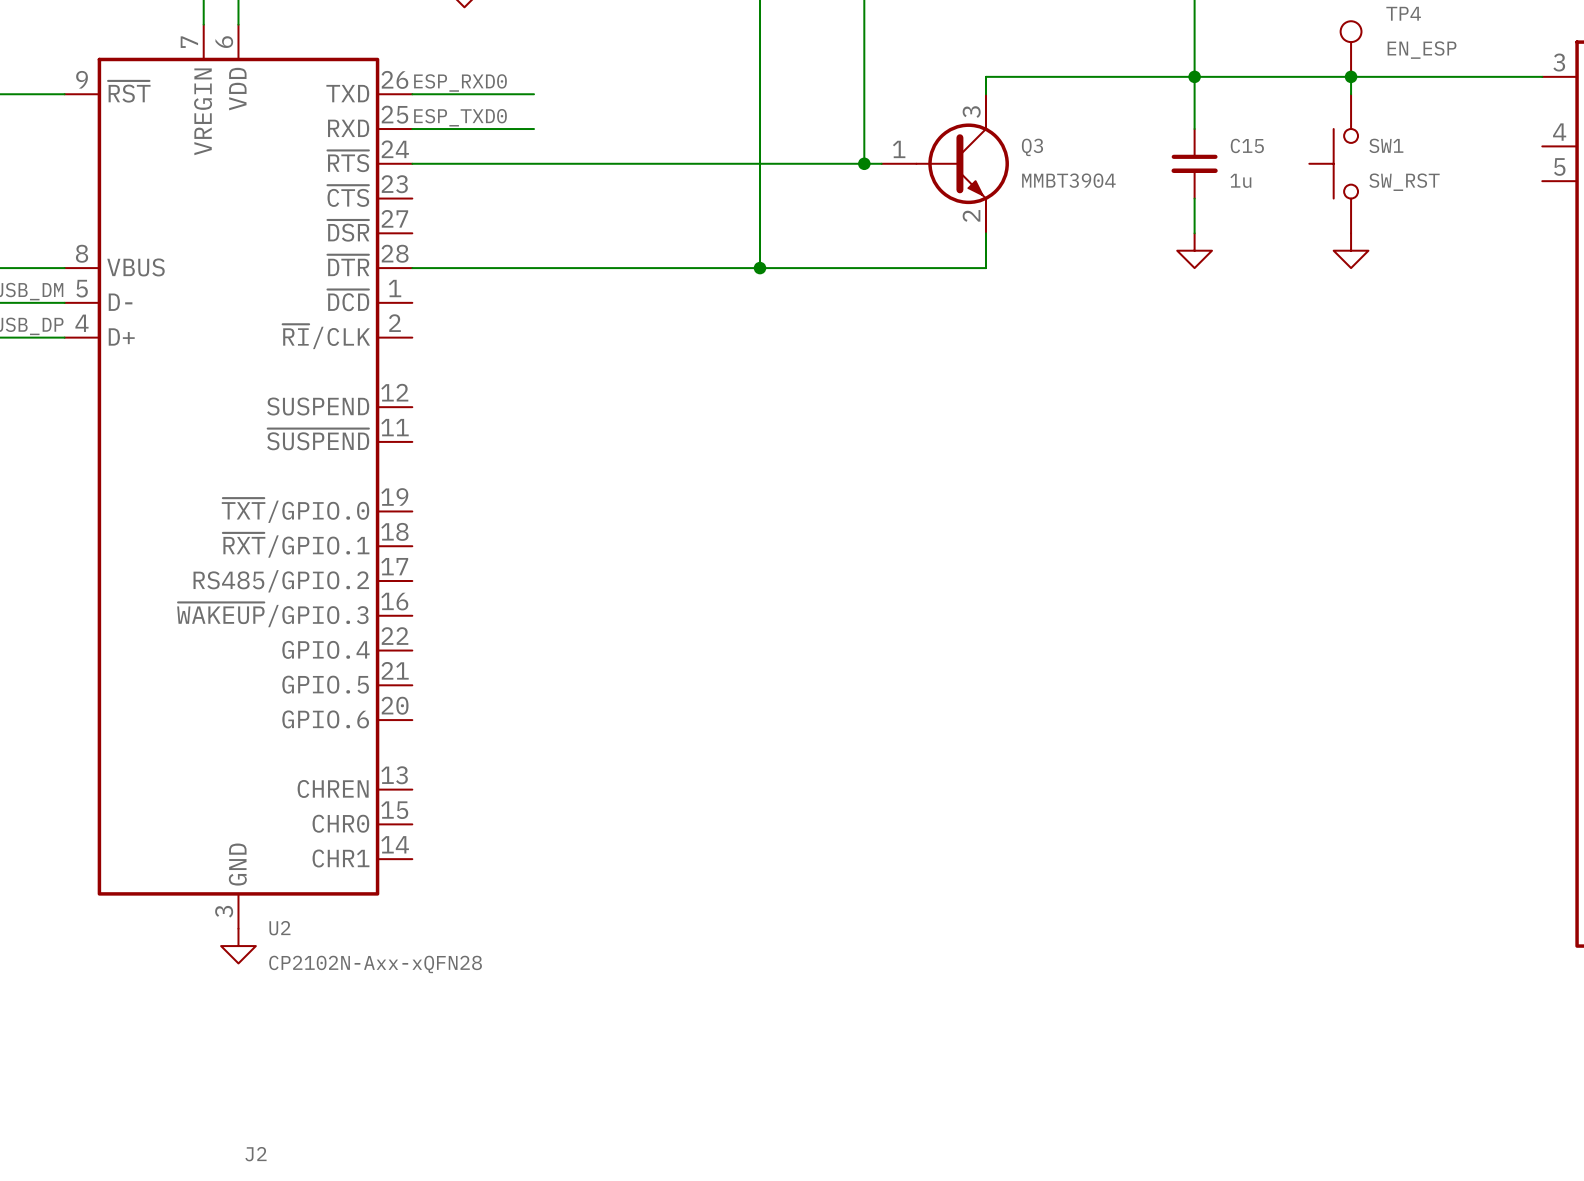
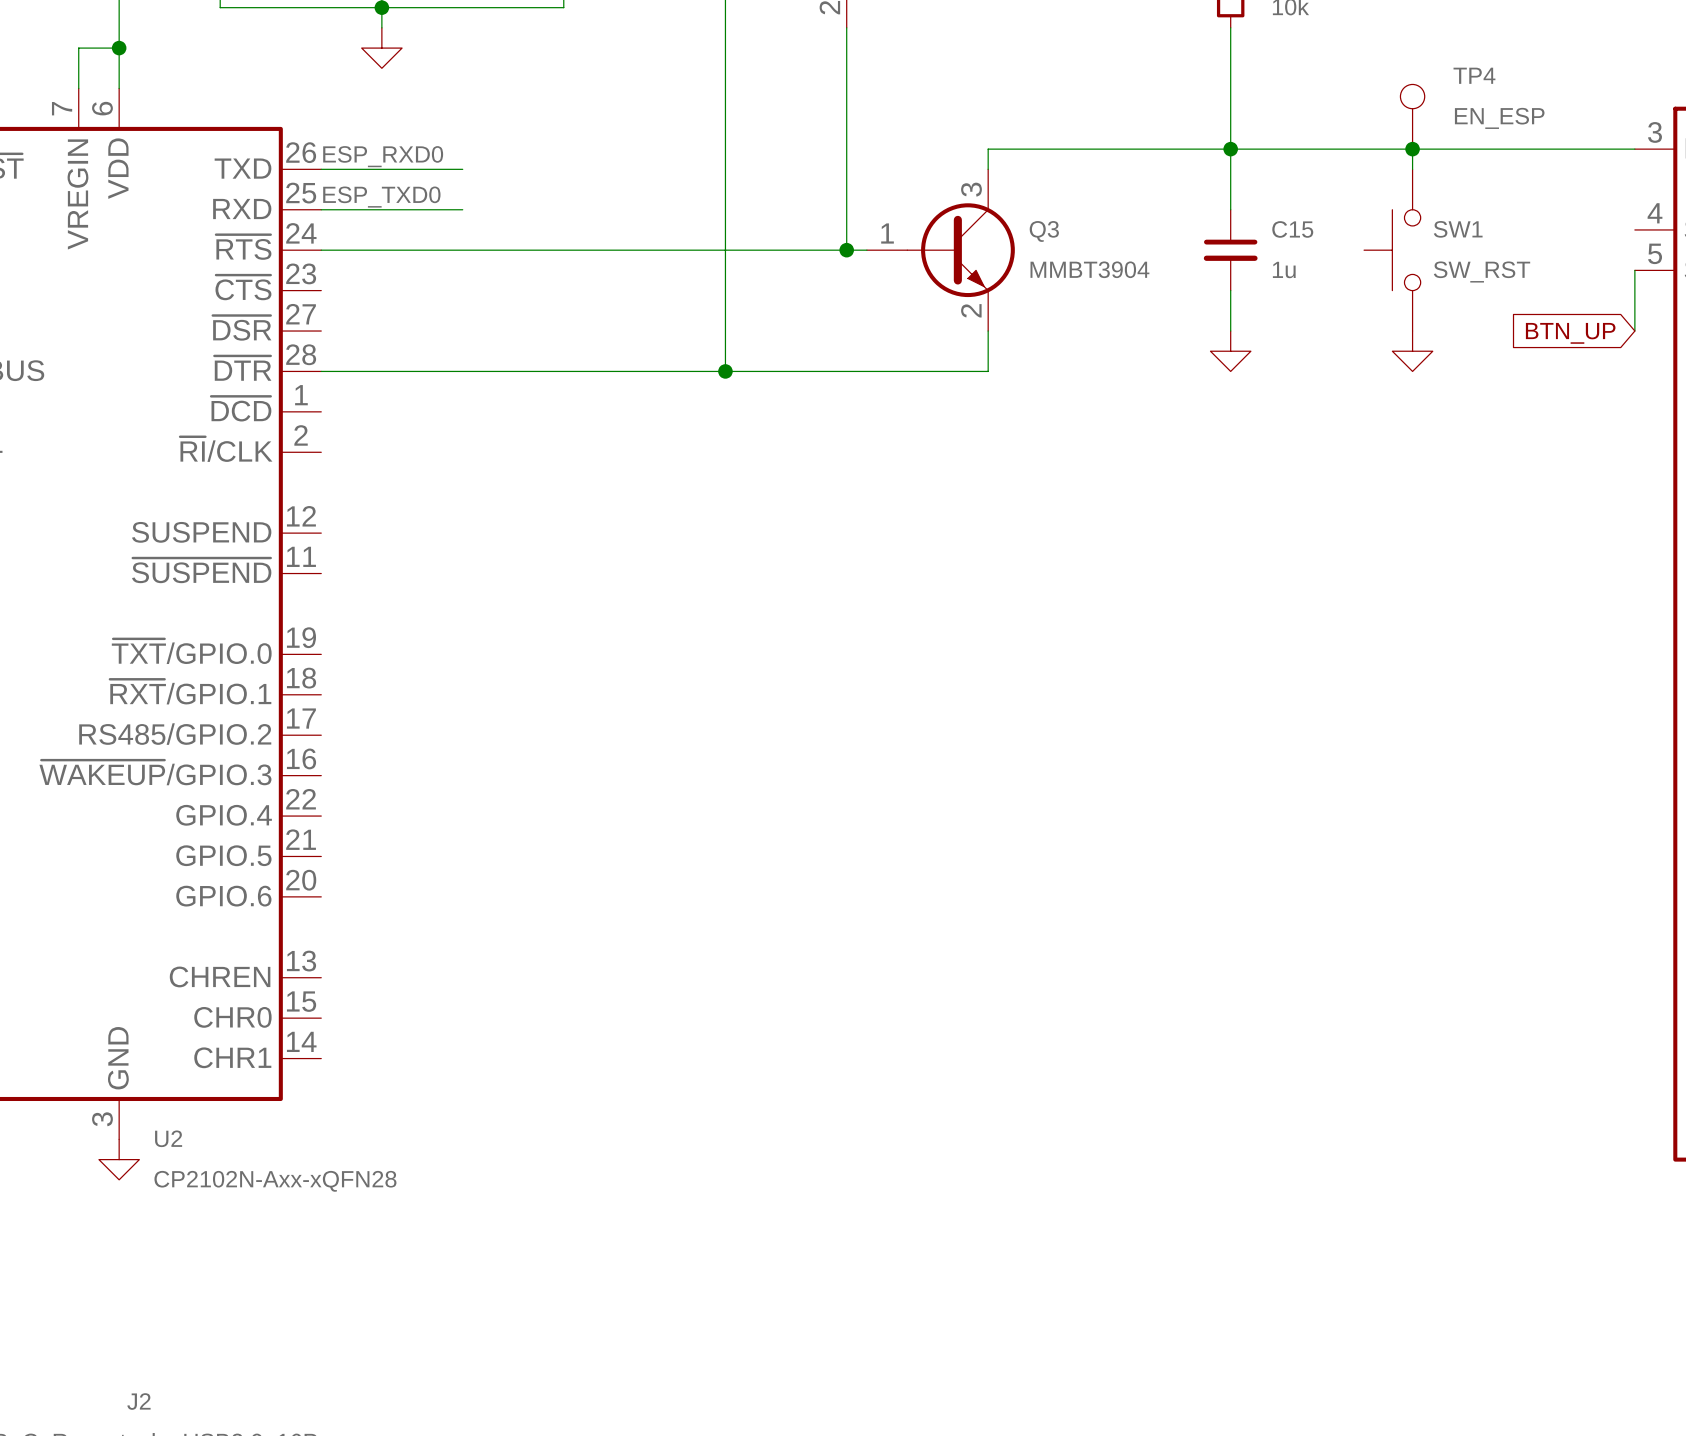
wire: none -> (1634, 270) (1634, 331)
global label: none -> BTN_UP (1570, 333)

